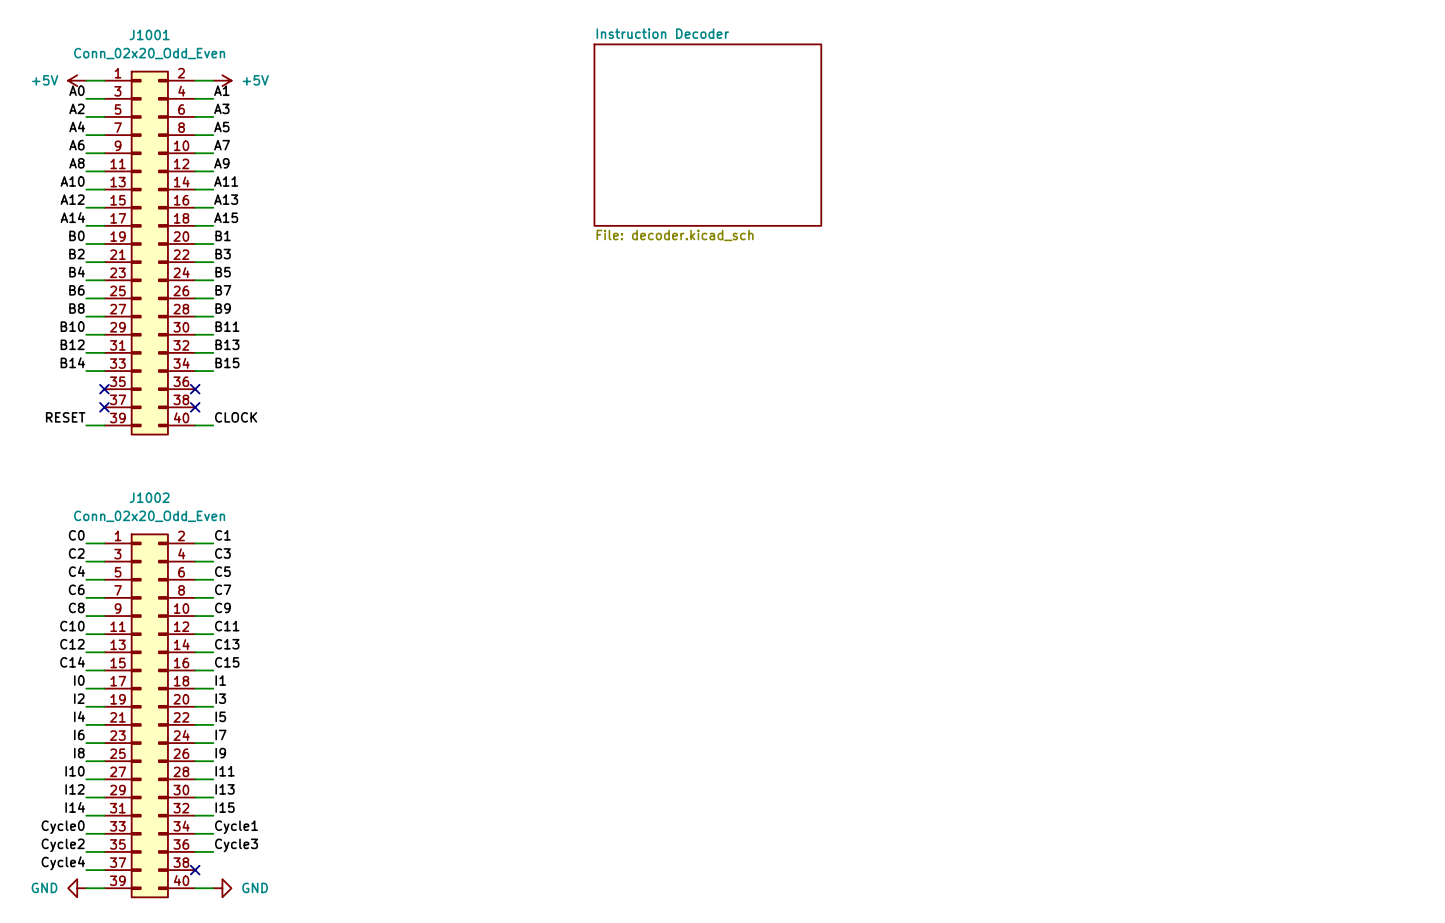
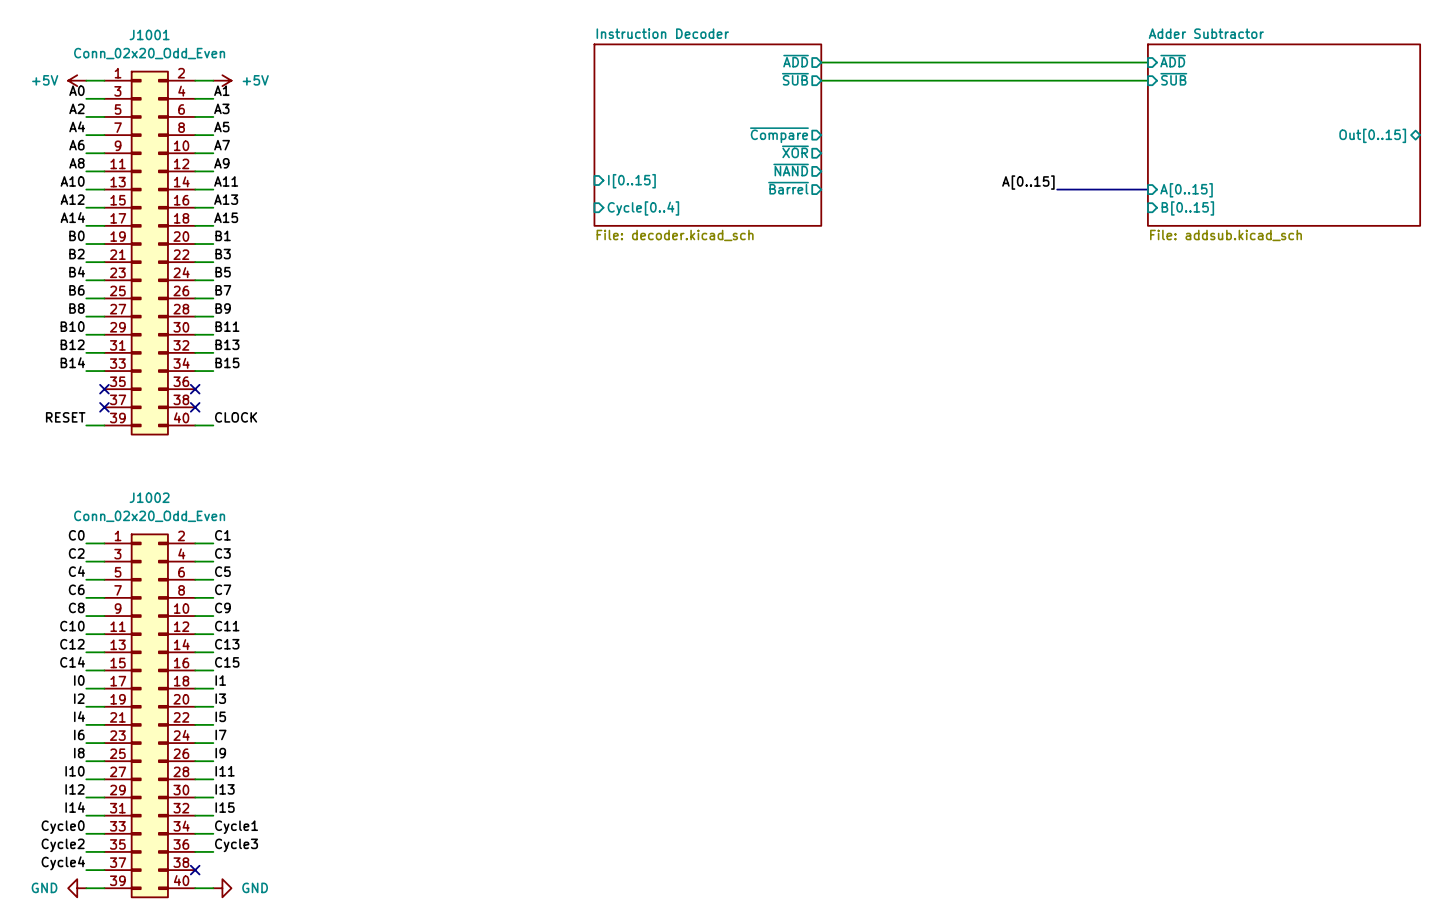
sheet pin: none -> ~{ADD} (796, 61)
sheet pin: none -> ~{ADD} (1173, 61)
wire: none -> (821, 62) (1147, 62)
sheet pin: none -> ~{SUB} (795, 79)
sheet pin: none -> ~{SUB} (1173, 79)
wire: none -> (821, 80) (1147, 80)
sheet pin: none -> ~{Compare} (779, 135)
sheet Adder Subtractor: none -> File: addsub.kicad_sch (1284, 135)
sheet pin: none -> Out[0..15] (1372, 135)
sheet pin: none -> ~{XOR} (795, 151)
sheet pin: none -> ~{NAND} (791, 170)
sheet pin: none -> I[0..15] (631, 181)
label: none -> A[0..15] (1028, 182)
sheet pin: none -> ~{Barrel} (788, 188)
bus: none -> (1057, 189) (1147, 189)
sheet pin: none -> A[0..15] (1186, 190)
sheet pin: none -> Cycle[0..4] (643, 208)
sheet pin: none -> B[0..15] (1187, 208)

